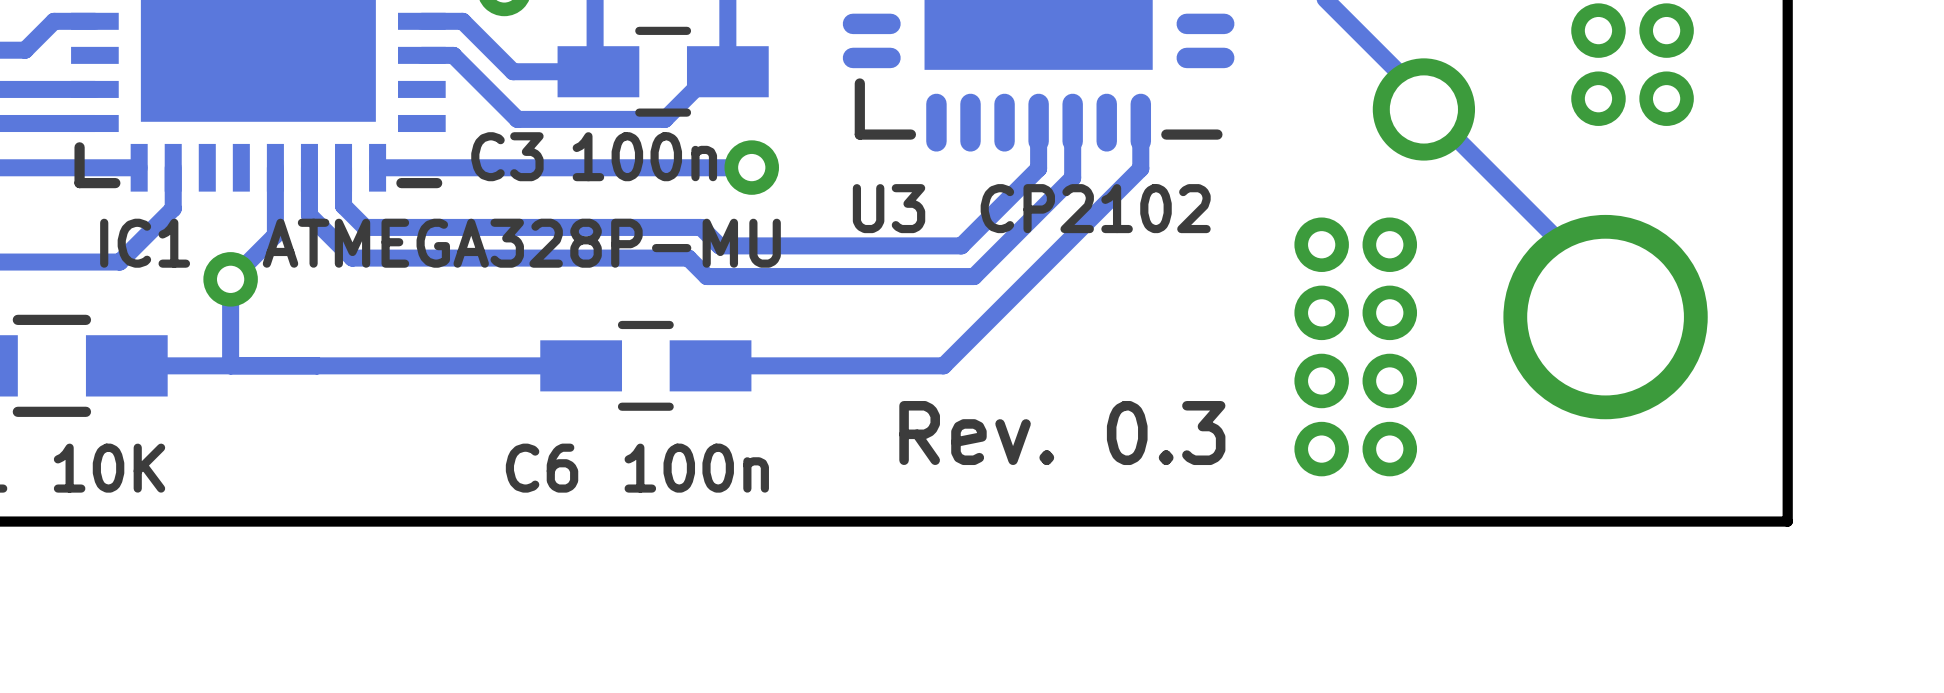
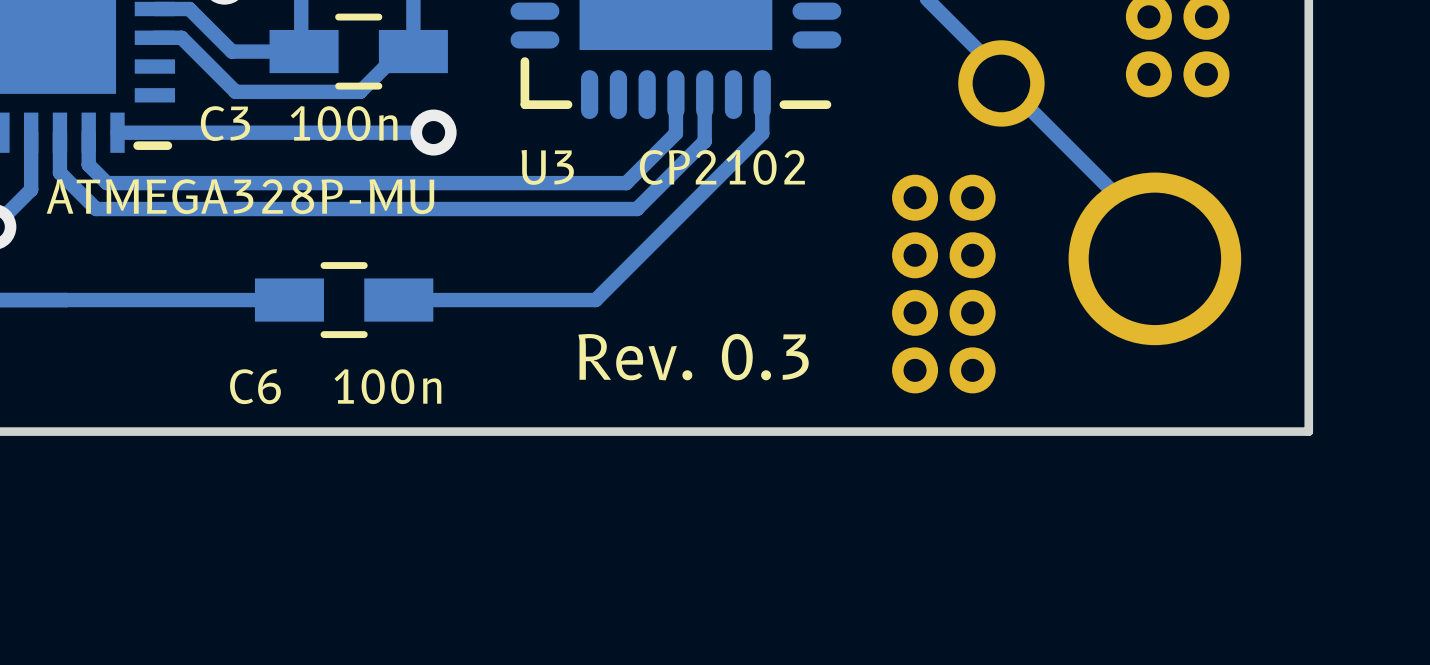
track: (979, 227) (961, 245) (719, 245) (701, 227) -> (626, 183) (390, 183)
track: (992, 258) (974, 276) (706, 276) (688, 258) -> (636, 209) (380, 209)

